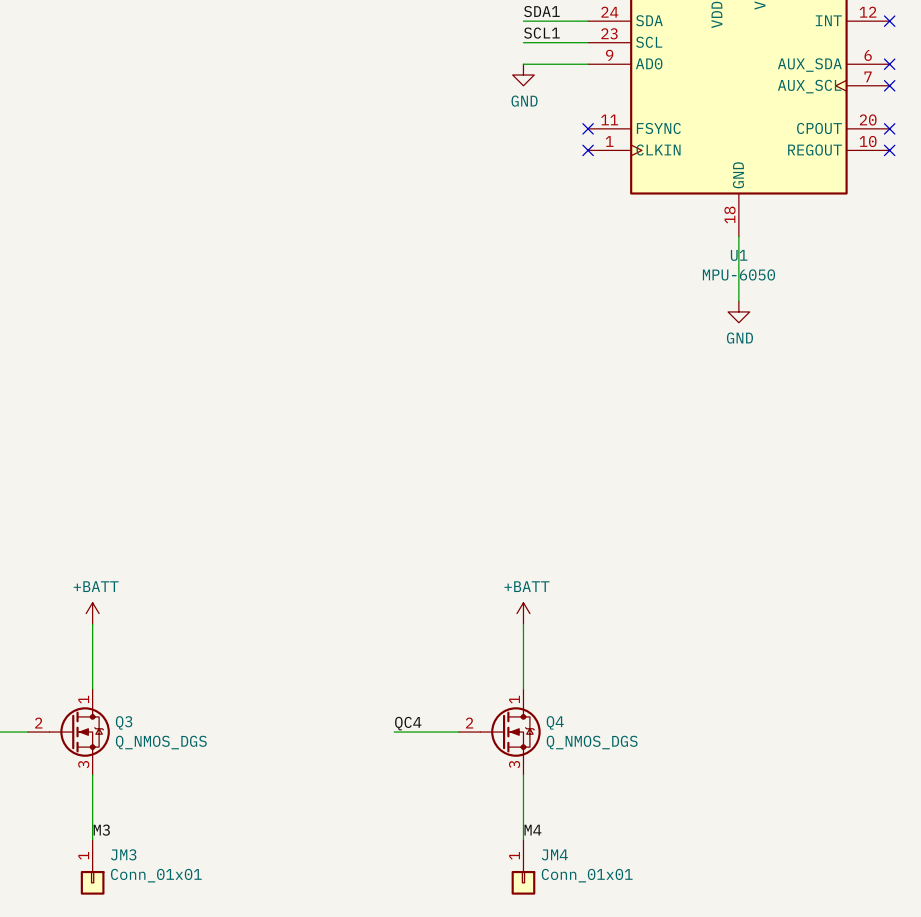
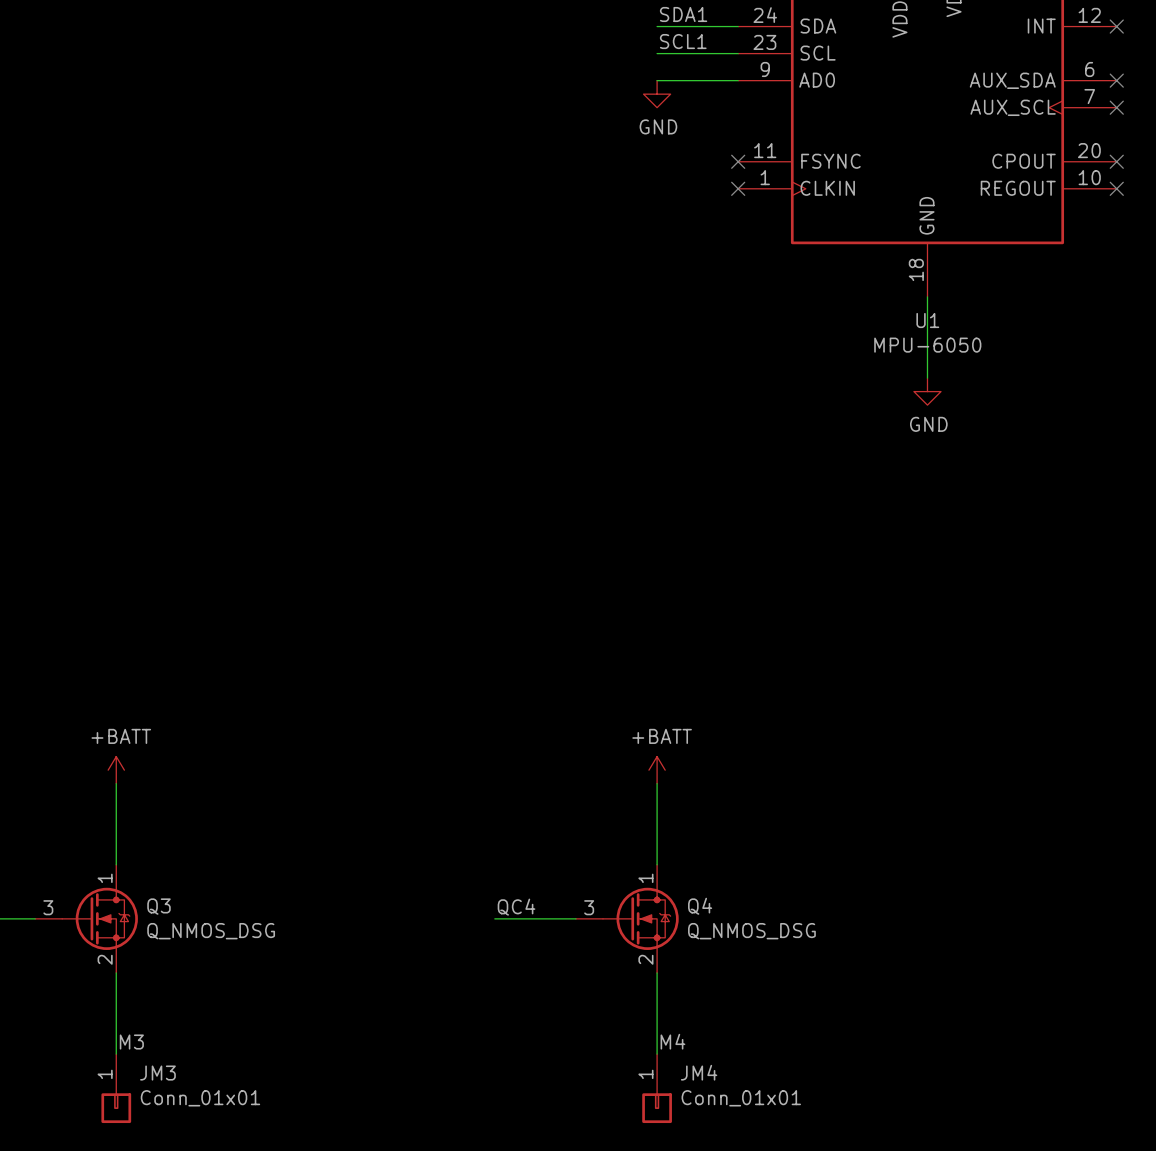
Q3 pin number: 2 (38, 723) -> 3 (48, 907)
Q4 pin number: 2 (469, 723) -> 3 (589, 907)
Q3 value: Q_NMOS_DGS (161, 742) -> Q_NMOS_DSG (211, 931)
Q4 value: Q_NMOS_DGS (592, 742) -> Q_NMOS_DSG (751, 931)
Q3 pin number: 3 (83, 764) -> 2 (105, 959)
Q4 pin number: 3 (514, 764) -> 2 (645, 959)

